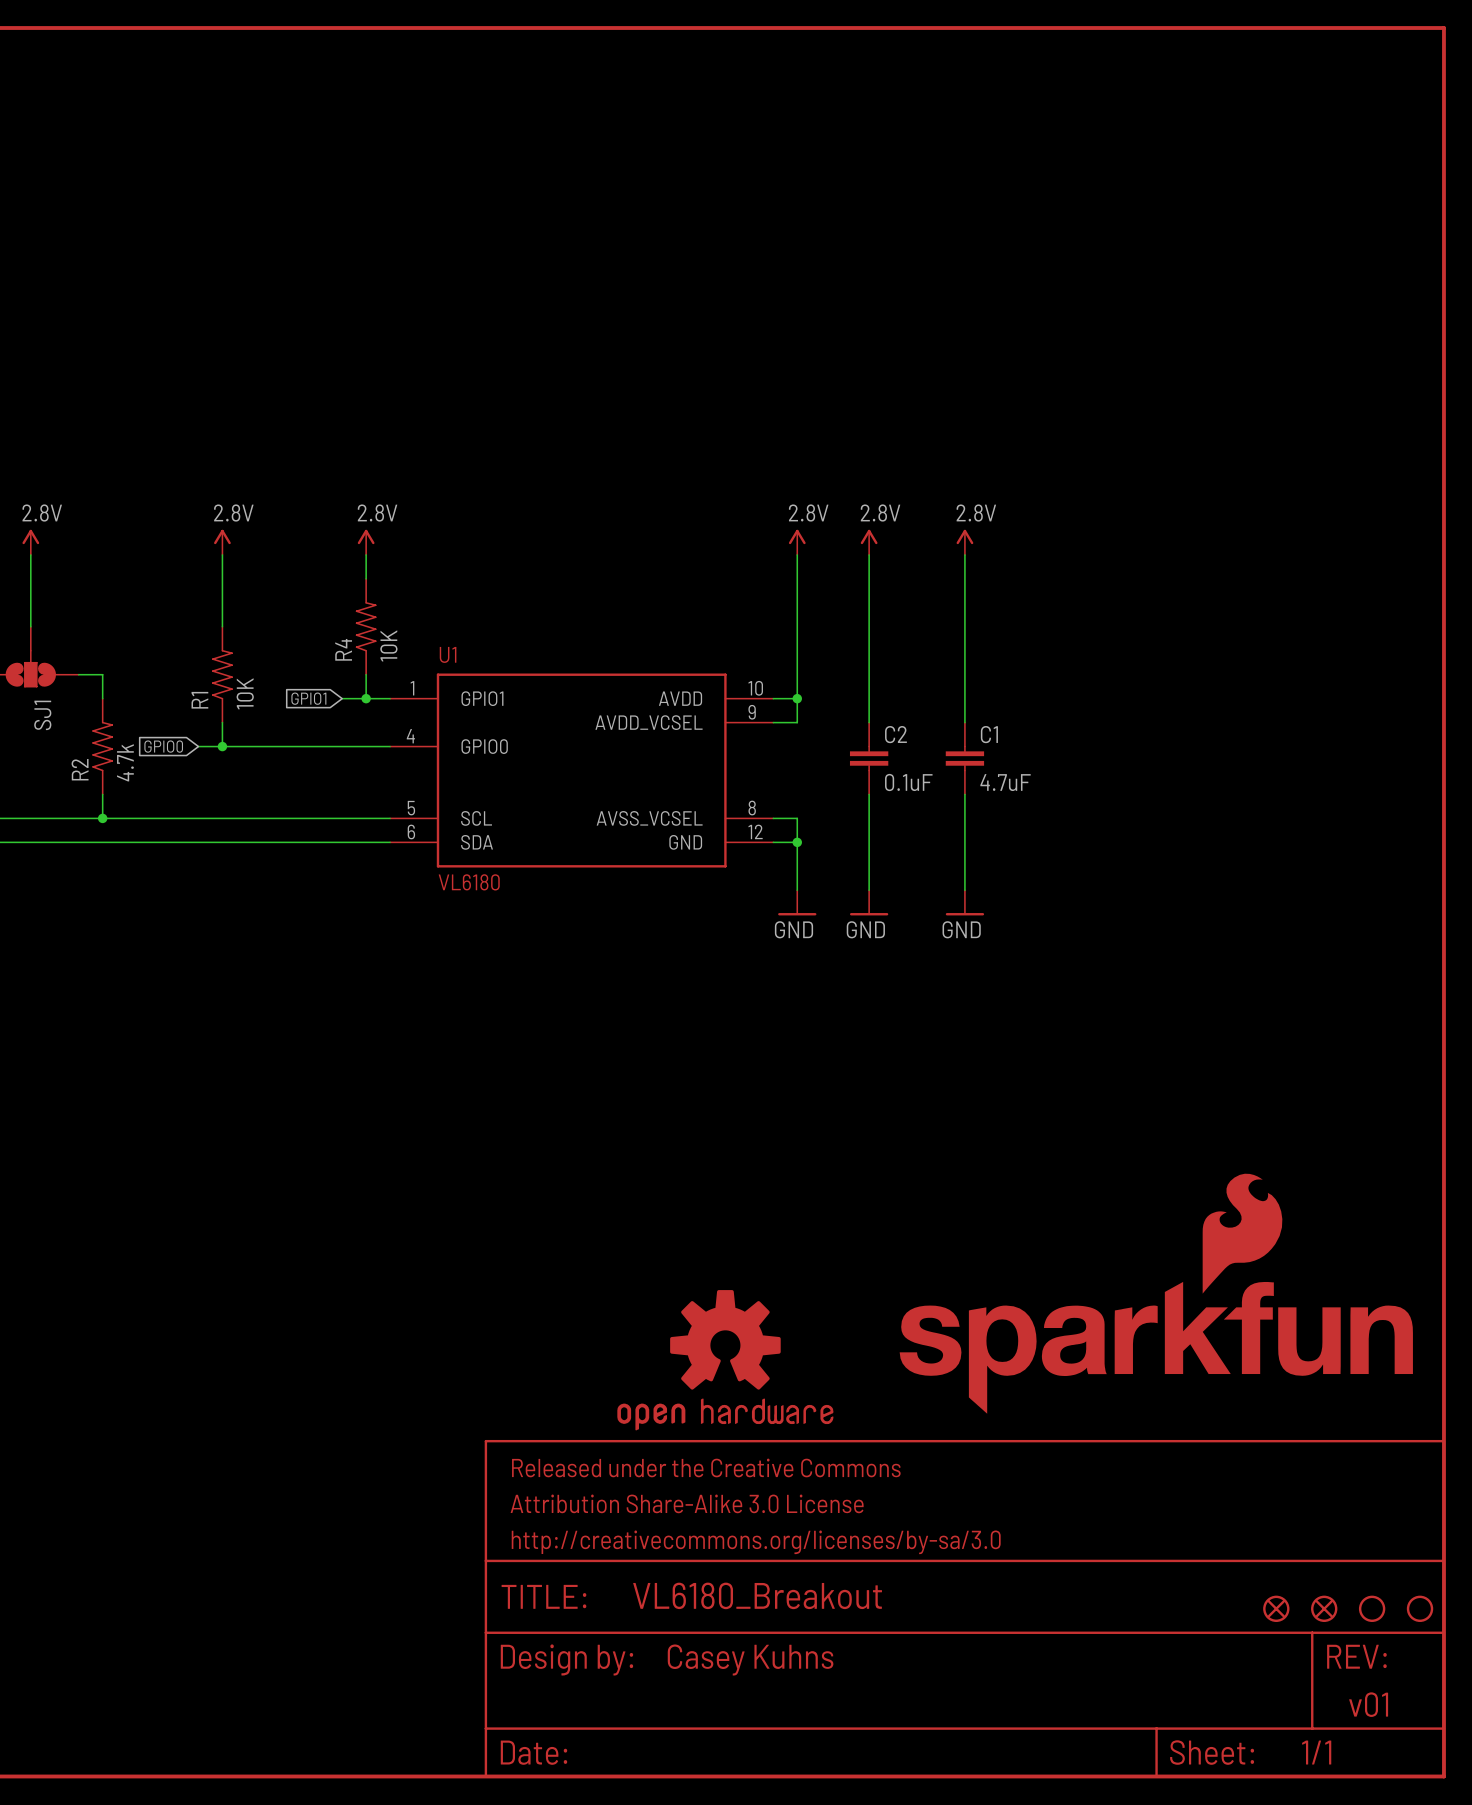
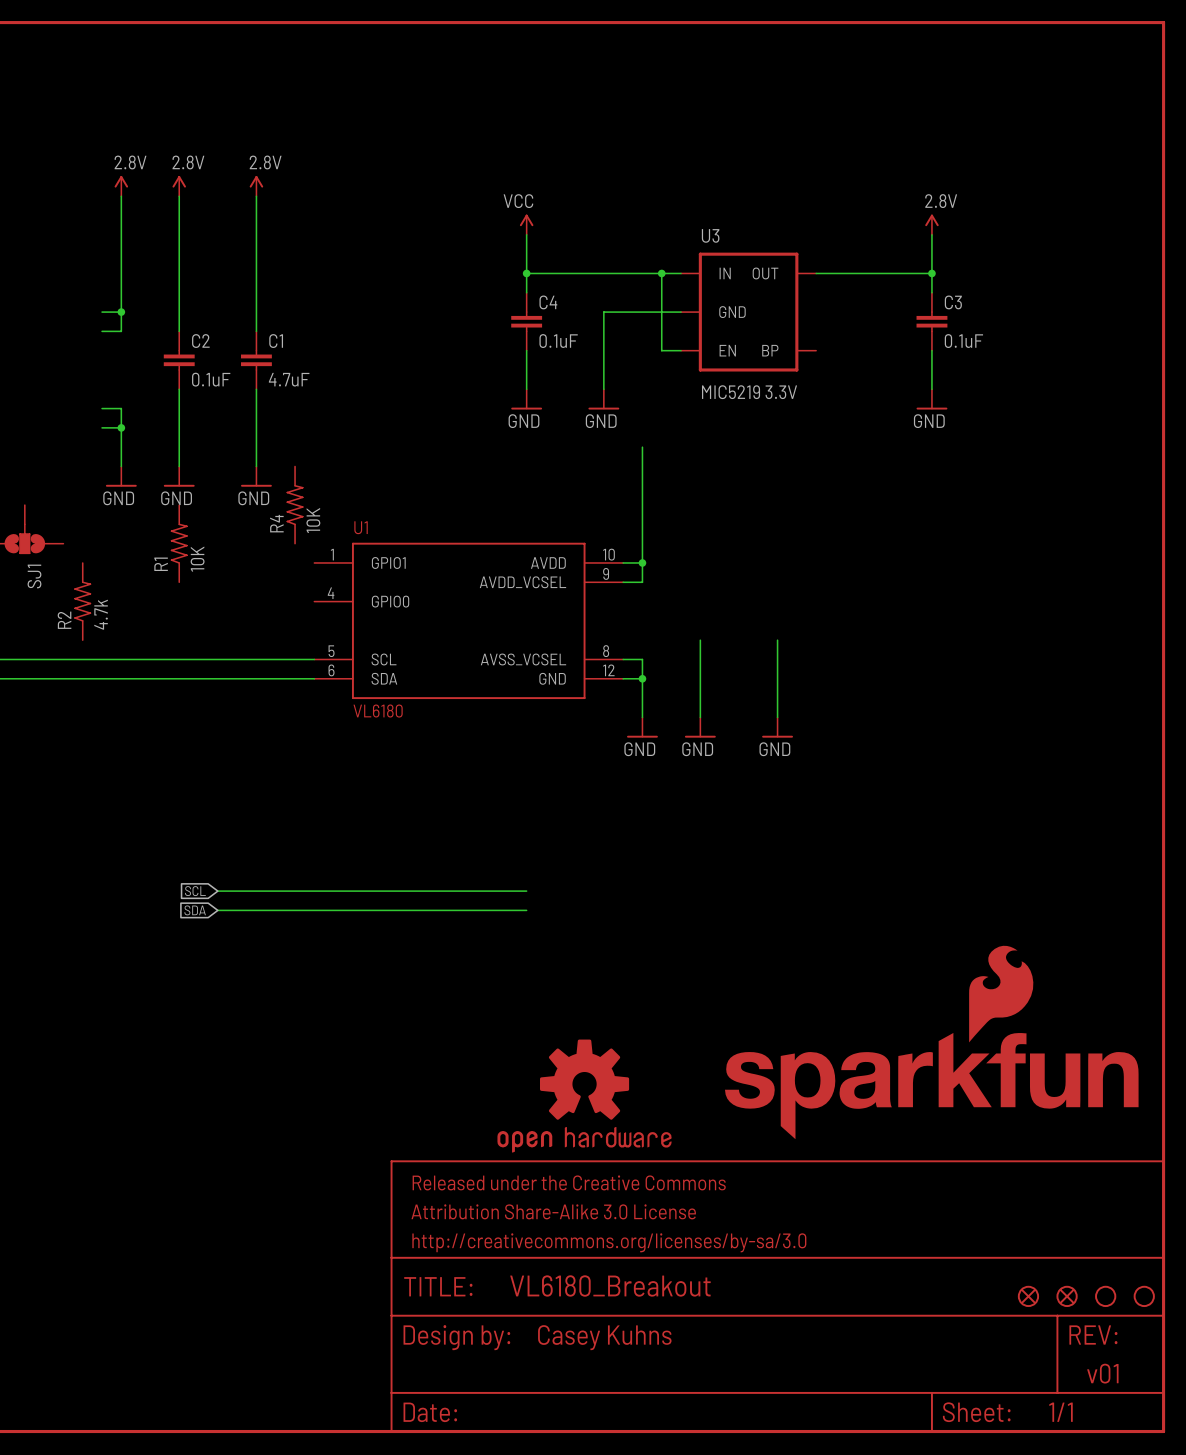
power symbol: none -> 2.8V (121, 186)
power symbol: none -> 2.8V (179, 186)
power symbol: none -> 2.8V (256, 186)
wire: none -> (121, 196) (121, 331) (102, 331)
wire: none -> (179, 196) (179, 331)
wire: none -> (256, 196) (256, 331)
power symbol: none -> VCC (526, 224)
power symbol: none -> 2.8V (931, 224)
wire: none -> (526, 234) (526, 292)
wire: none -> (931, 234) (931, 292)
wire: none -> (526, 273) (681, 273)
junction: none -> (526, 273)
wire: none -> (661, 273) (661, 350) (681, 350)
junction: none -> (661, 273)
wire: none -> (816, 273) (931, 273)
junction: none -> (931, 273)
wire: none -> (102, 312) (121, 312)
junction: none -> (121, 312)
wire: none -> (681, 312) (603, 312) (603, 389)
U3: none -> MIC5219 3.3V (748, 312)
C4: none -> 0.1uF (526, 321)
C3: none -> 0.1uF (931, 321)
wire: none -> (526, 350) (526, 389)
wire: none -> (931, 350) (931, 389)
wire: none -> (256, 389) (256, 466)
power symbol: none -> GND (526, 399)
power symbol: none -> GND (603, 399)
power symbol: none -> GND (931, 399)
wire: none -> (102, 408) (121, 408) (121, 466)
wire: none -> (102, 427) (121, 427)
junction: none -> (121, 427)
power symbol: 2.8V (30, 542) -> none
power symbol: 2.8V (222, 542) -> none
power symbol: 2.8V (366, 542) -> none
power symbol: 2.8V (797, 542) -> none
power symbol: 2.8V (869, 542) -> none
power symbol: 2.8V (964, 542) -> none
wire: (30, 554) (30, 626) -> (179, 389) (179, 447)
wire: (366, 554) (366, 578) -> none
wire: (869, 554) (869, 722) -> none
wire: (964, 554) (964, 722) -> none
power symbol: none -> GND (121, 476)
power symbol: none -> GND (179, 476)
power symbol: none -> GND (256, 476)
wire: (78, 674) (102, 674) (102, 698) -> none
wire: (366, 674) (366, 698) -> none
global label: GPIO1 (308, 698) -> none
wire: (342, 698) (390, 698) -> none
junction: (366, 698) -> none
wire: (222, 722) (222, 746) -> none
global label: GPIO0 (163, 746) -> none
wire: (198, 746) (390, 746) -> none
junction: (222, 746) -> none
C2 position: (869, 758) -> (179, 360)
C1 position: (964, 758) -> (256, 360)
wire: (102, 794) (102, 818) -> none
junction: (102, 818) -> none
global label: none -> SCL (195, 891)
wire: none -> (217, 891) (526, 891)
global label: none -> SDA (195, 910)
wire: none -> (217, 910) (526, 910)

